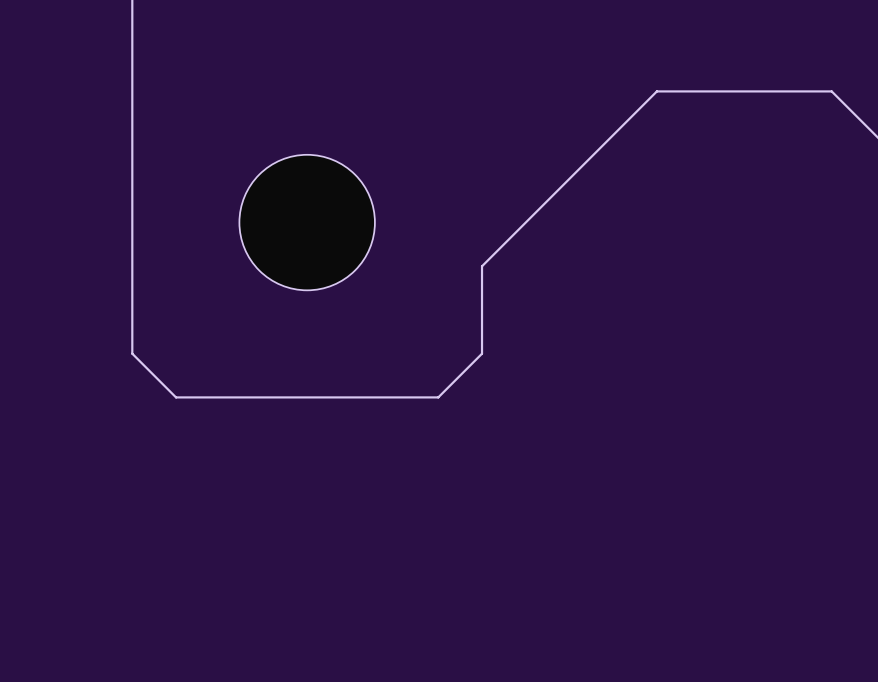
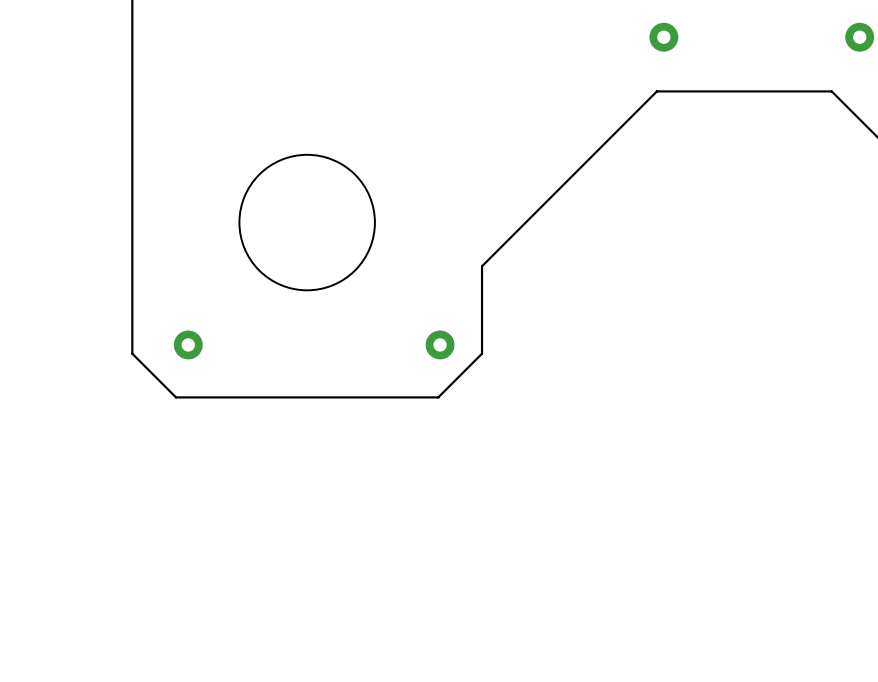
via: none -> (663, 37)
via: none -> (859, 37)
via: none -> (188, 344)
via: none -> (440, 344)

